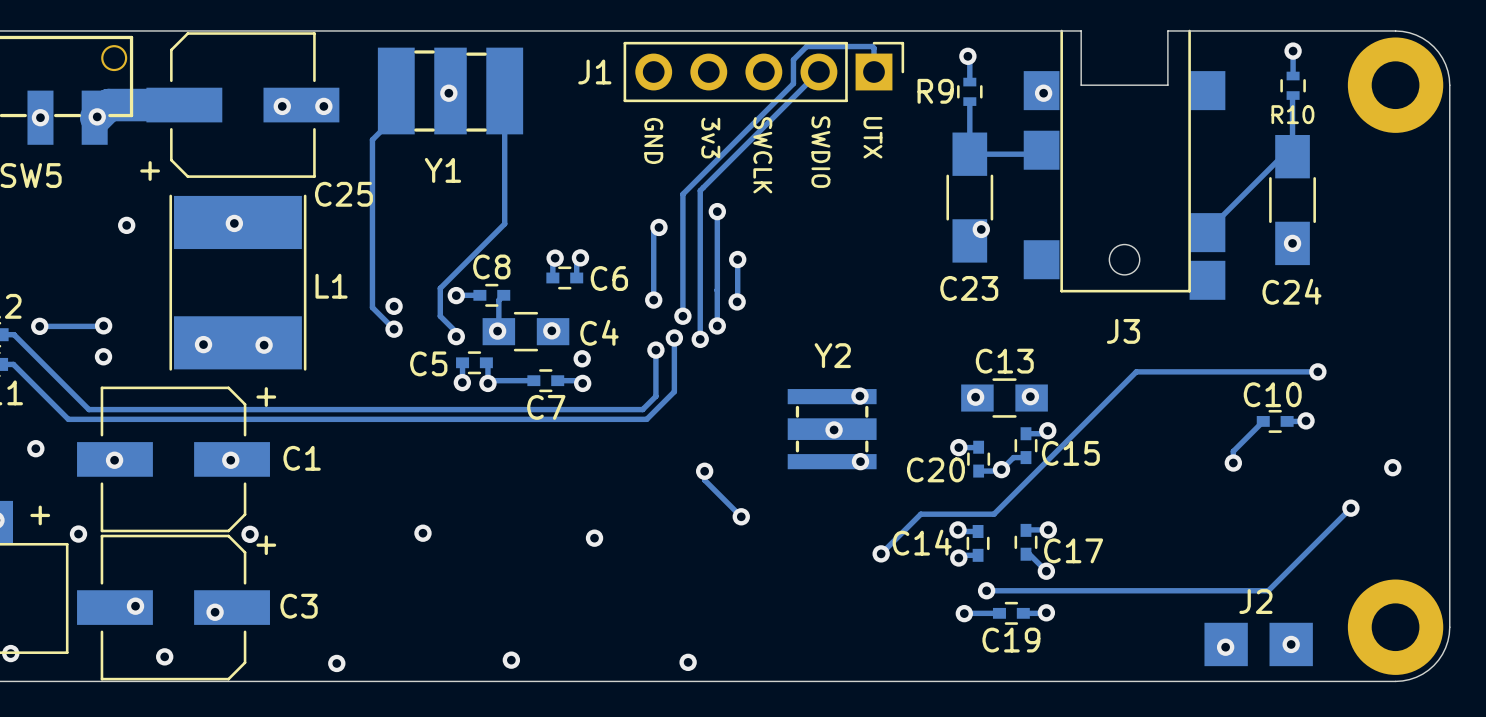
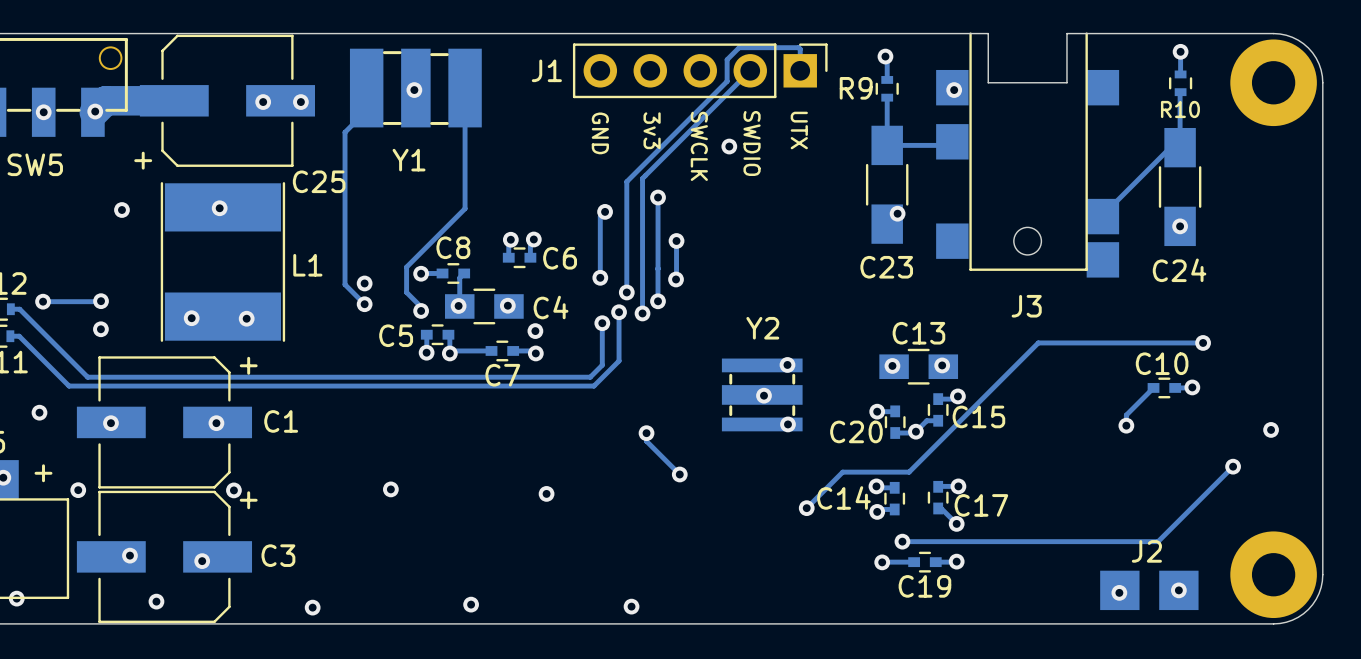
via: none -> (729, 146)

